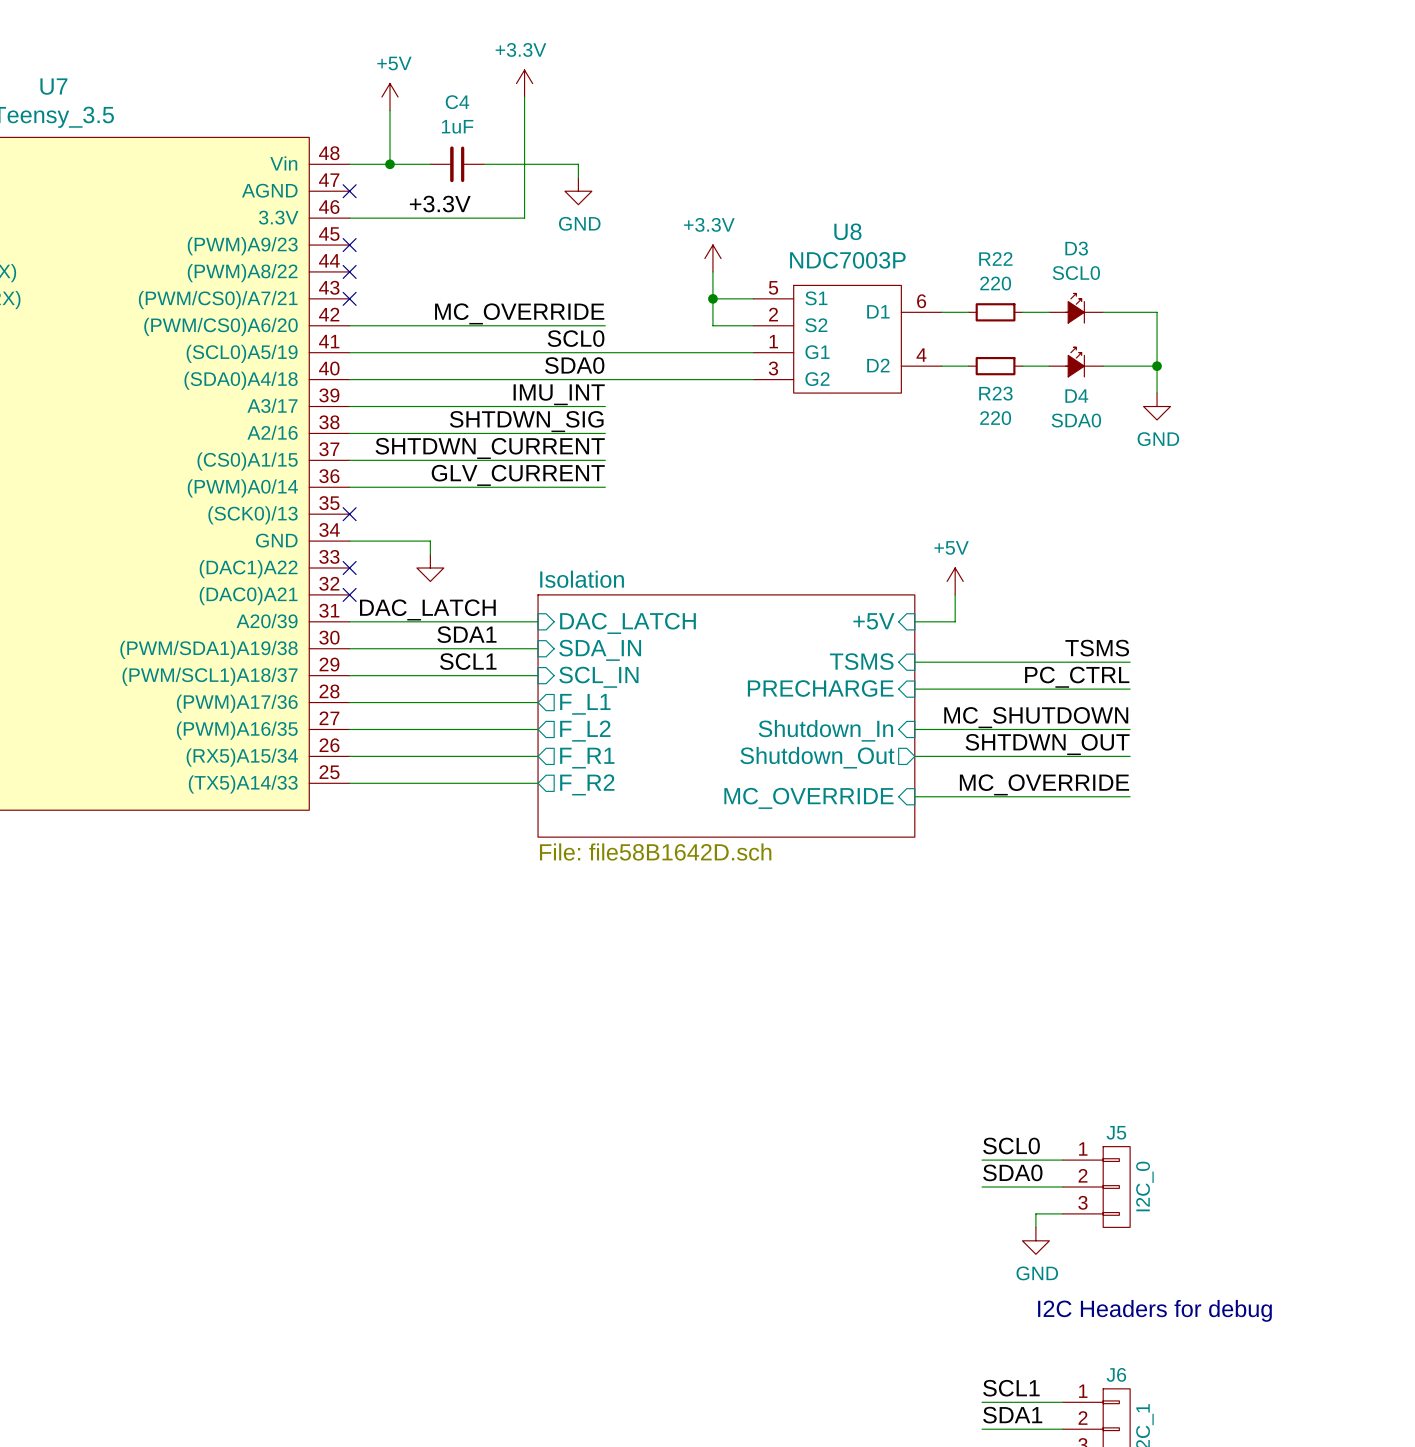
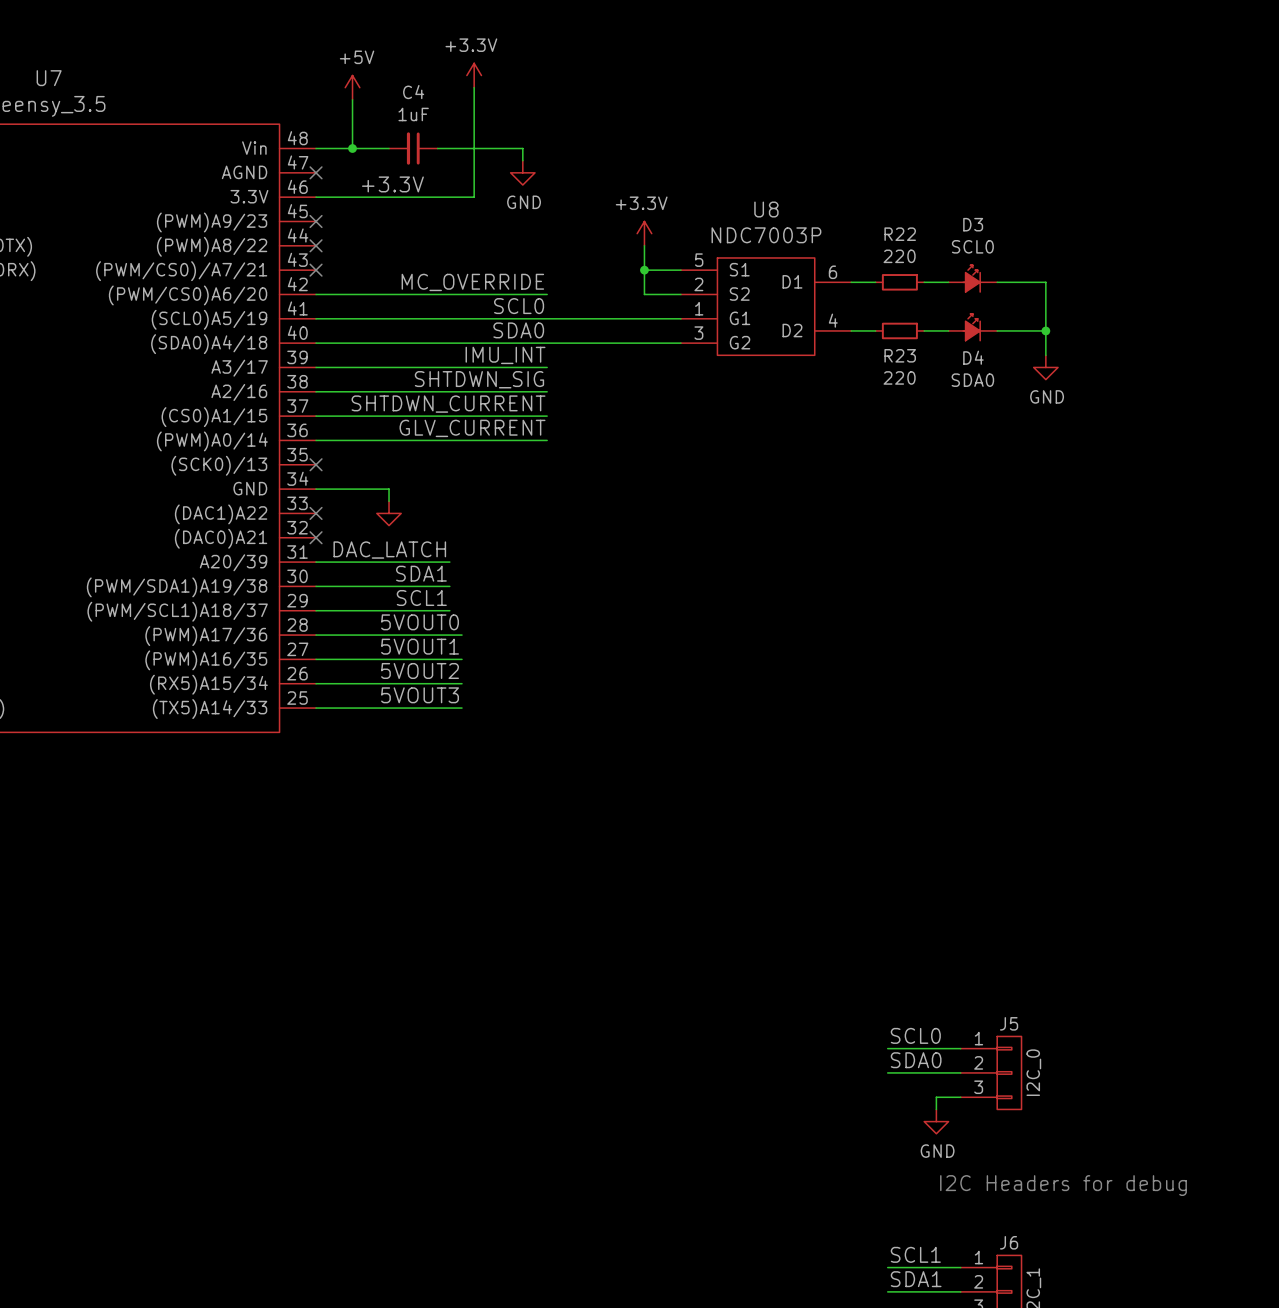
power symbol: +5V (955, 581) -> none
wire: (955, 594) (955, 621) (914, 621) -> none
wire: (497, 621) (538, 621) -> none
sheet pin: +5V (873, 621) -> none
sheet pin: DAC_LATCH (627, 623) -> none
wire: (497, 648) (538, 648) -> none
label: TSMS (1097, 648) -> none
sheet pin: SDA_IN (600, 650) -> none
sheet pin: TSMS (861, 661) -> none
wire: (914, 662) (1130, 662) -> none
wire: (497, 675) (538, 675) -> none
sheet pin: SCL_IN (598, 677) -> none
label: PC_CTRL (1077, 677) -> none
label: none -> 5VOUT0 (420, 622)
sheet pin: PRECHARGE (820, 688) -> none
wire: (914, 689) (1130, 689) -> none
wire: (511, 702) (538, 702) -> none
sheet pin: F_L1 (585, 704) -> none
label: none -> 5VOUT1 (420, 646)
sheet Isolation: File: file58B1642D.sch (726, 716) -> none
label: MC_SHUTDOWN (1036, 717) -> none
wire: (511, 729) (538, 729) -> none
wire: (914, 729) (1130, 729) -> none
sheet pin: Shutdown_In (825, 730) -> none
sheet pin: F_L2 (585, 731) -> none
label: none -> 5VOUT2 (420, 670)
label: SHTDWN_OUT (1047, 744) -> none
wire: (511, 756) (538, 756) -> none
wire: (914, 756) (1130, 756) -> none
sheet pin: Shutdown_Out (817, 757) -> none
sheet pin: F_R1 (587, 758) -> none
label: none -> 5VOUT3 (420, 695)
wire: (511, 783) (538, 783) -> none
sheet pin: F_R2 (587, 784) -> none
label: MC_OVERRIDE (1044, 784) -> none
wire: (914, 796) (1130, 796) -> none
sheet pin: MC_OVERRIDE (809, 798) -> none

